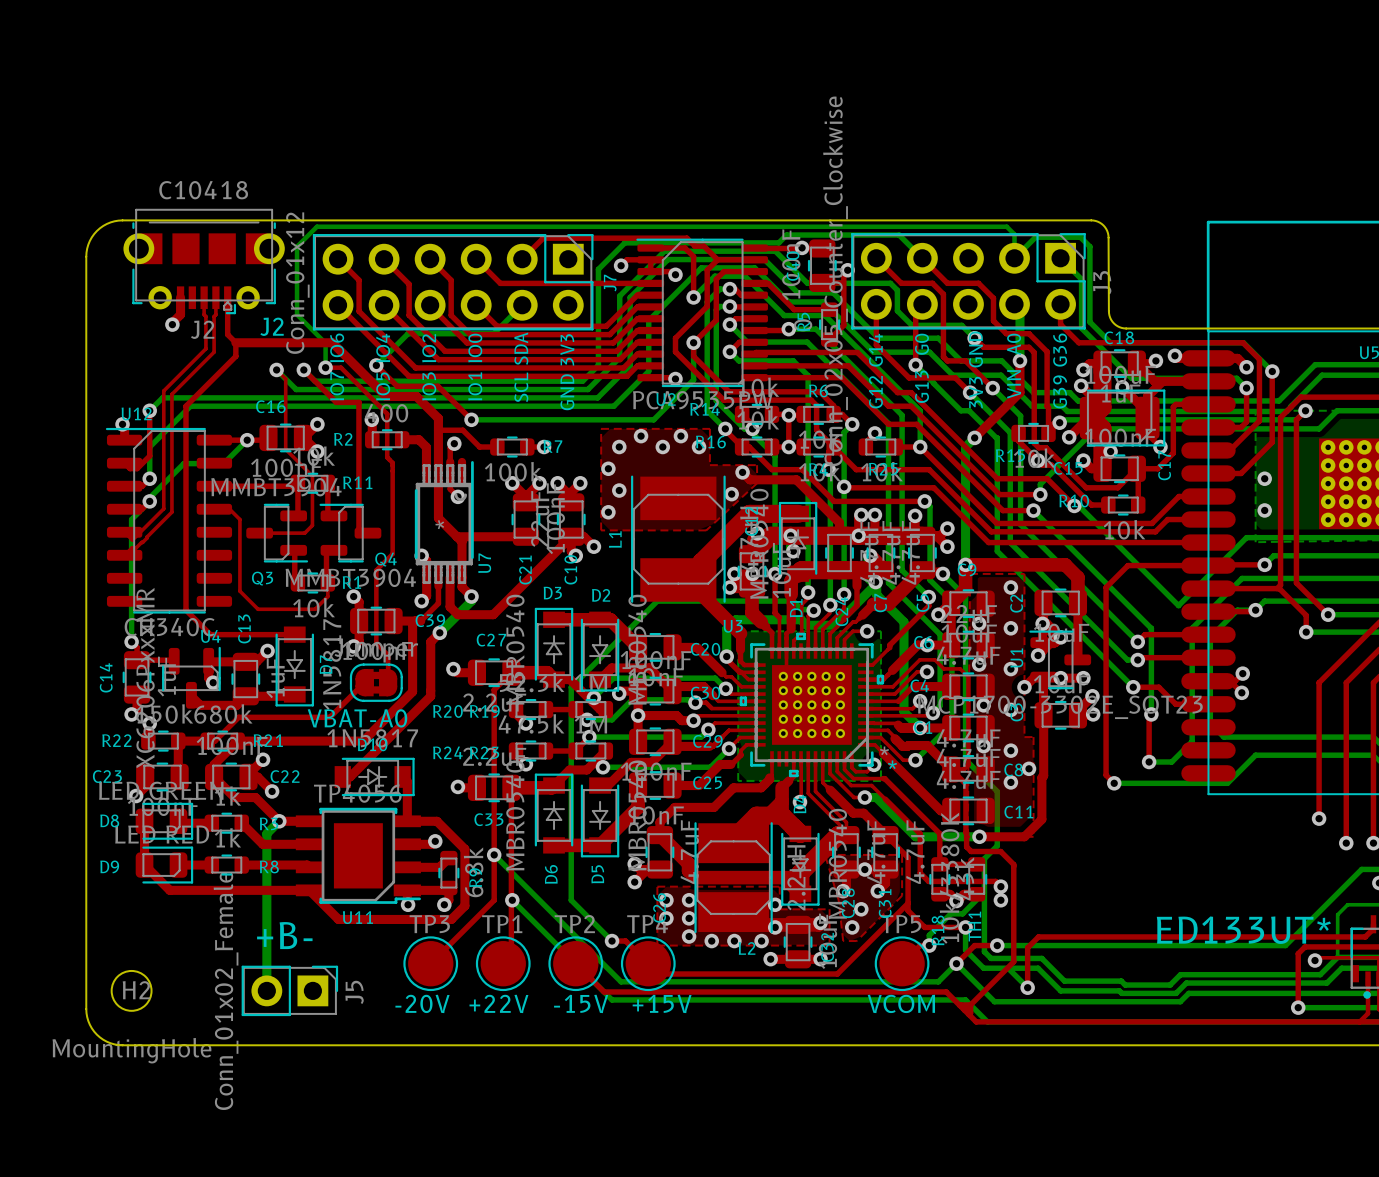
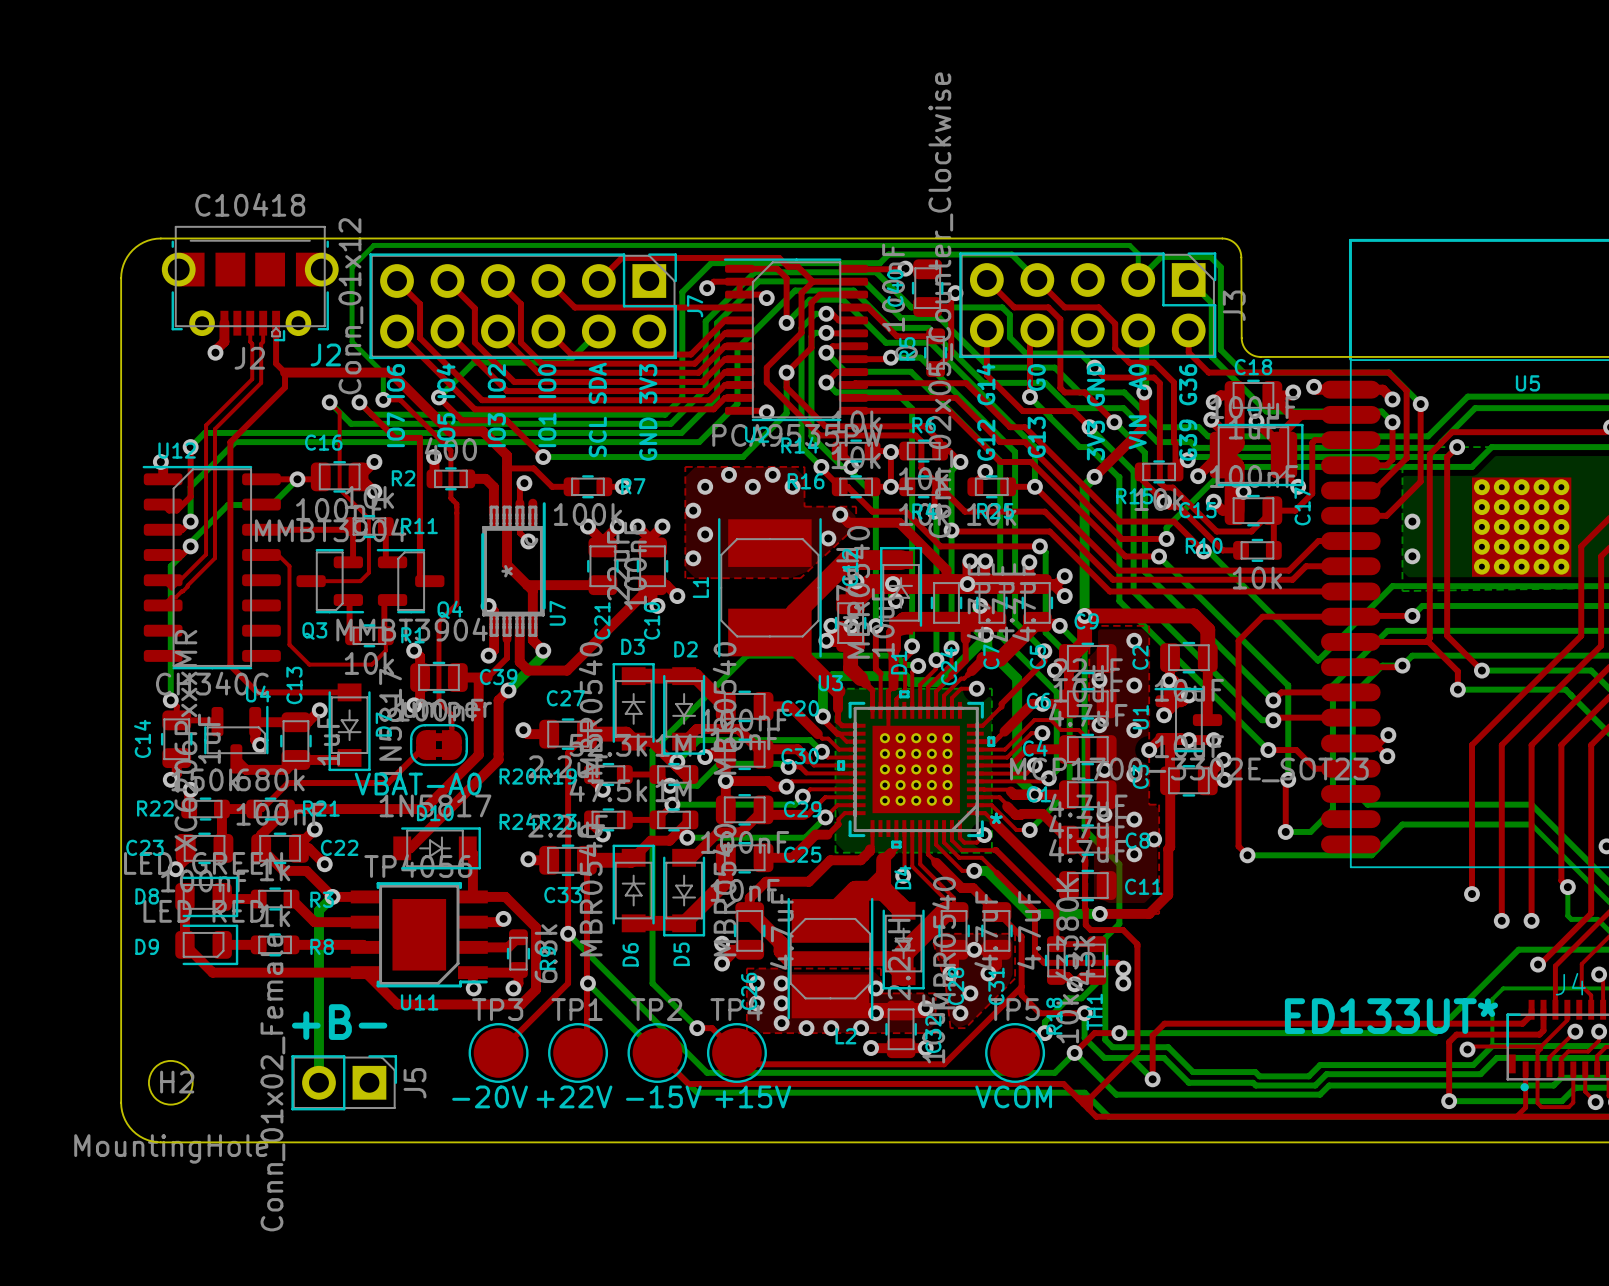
U3 footprint: [739, 632, 885, 778] -> [837, 690, 996, 849]

